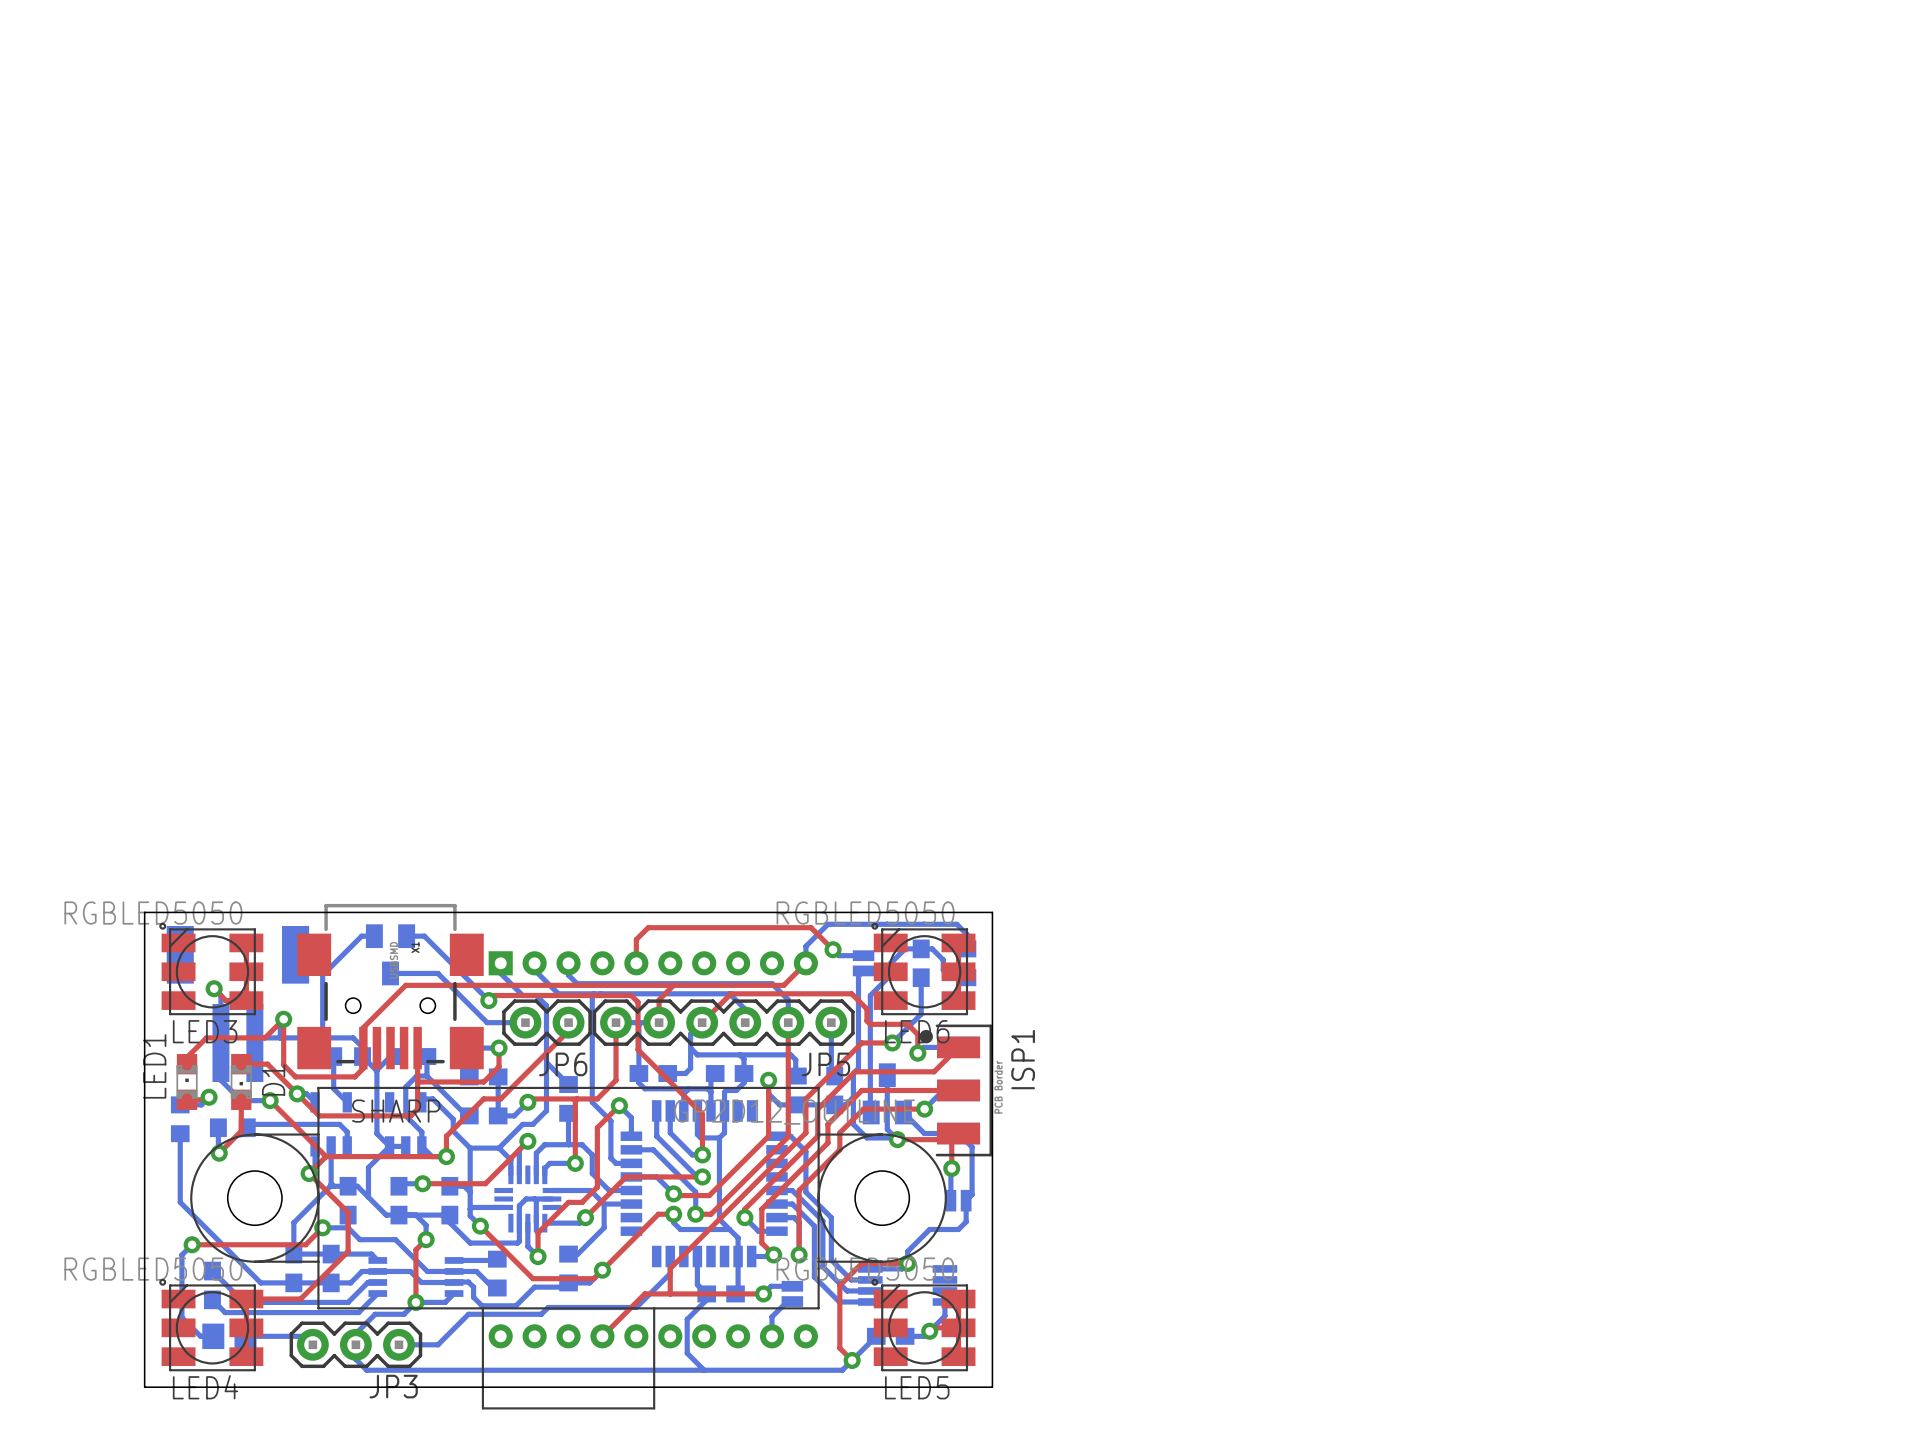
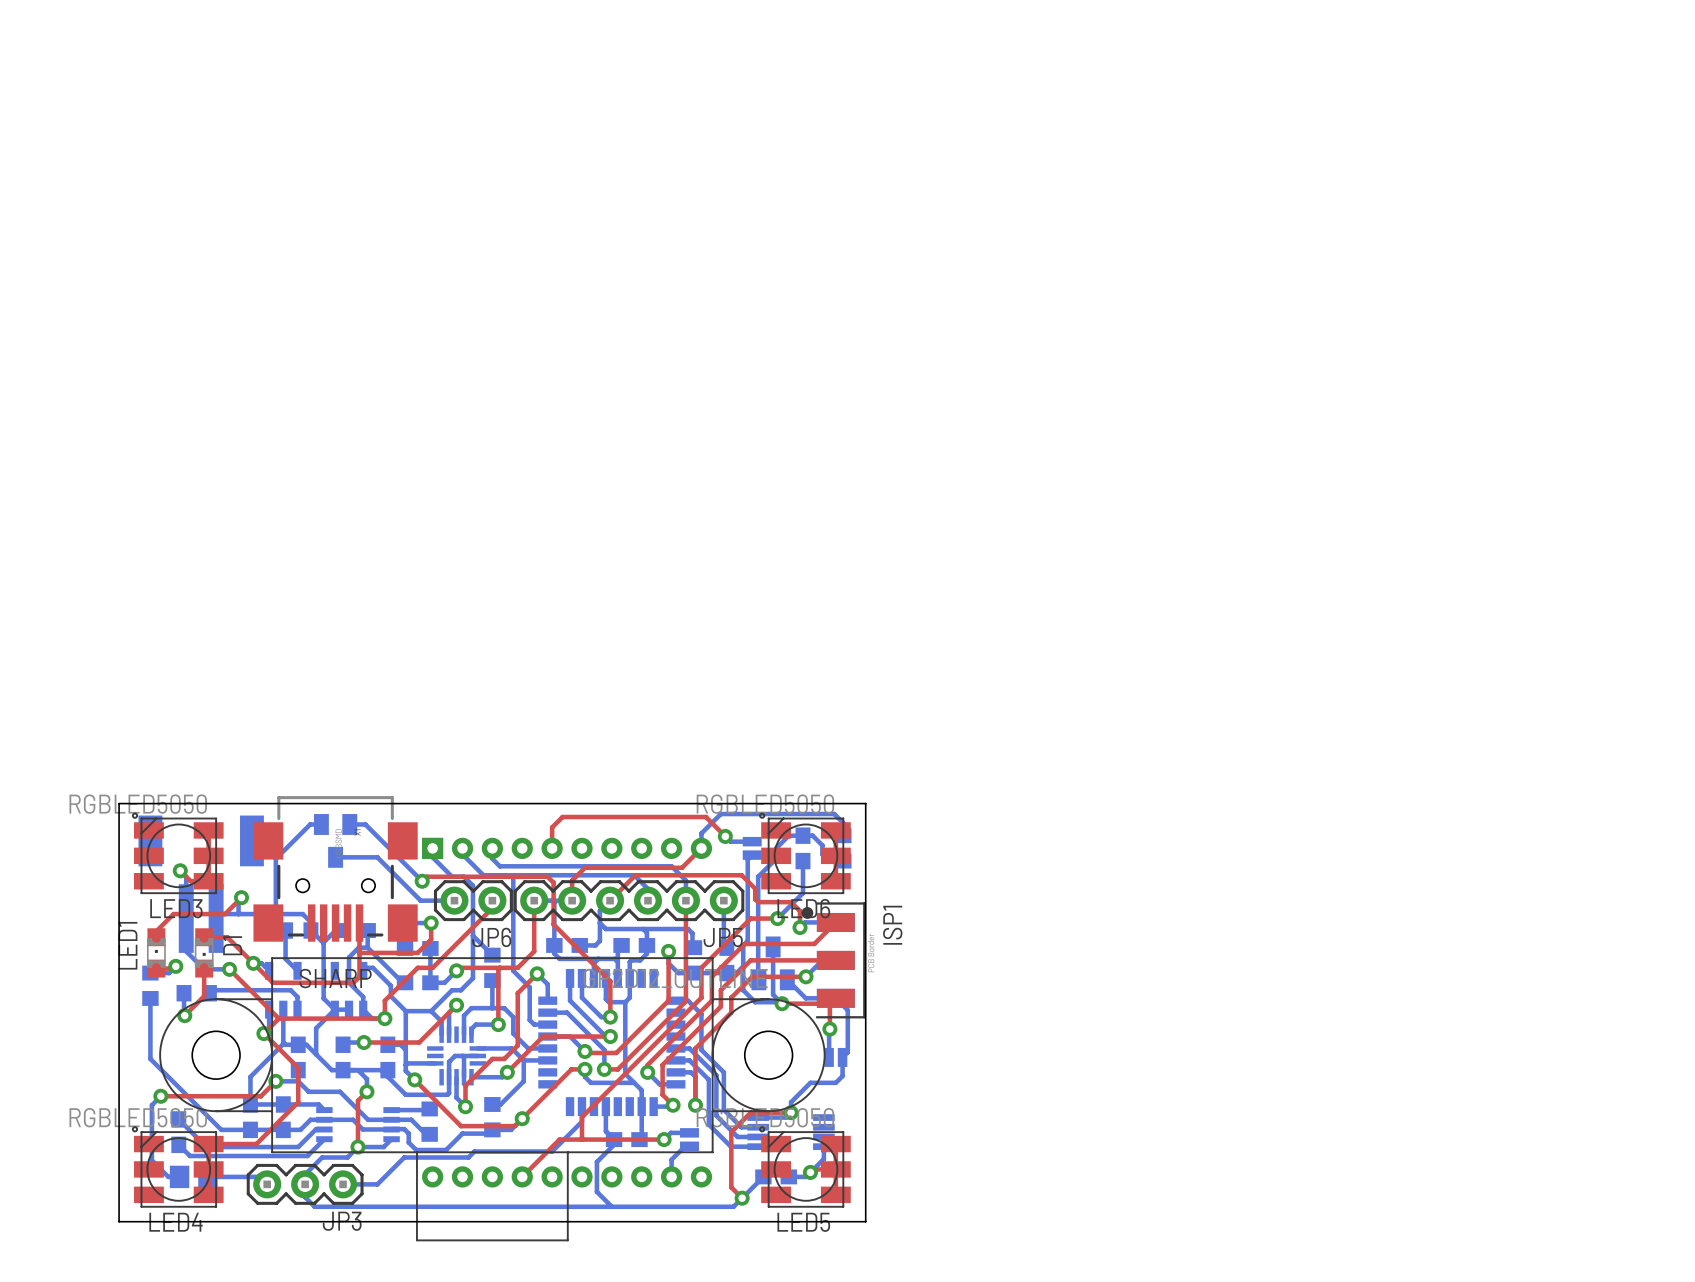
top track: (673, 985) (405, 985) (363, 1027) (363, 1068) (354, 1076) (295, 1076) (283, 1065) (283, 1019) -> none

